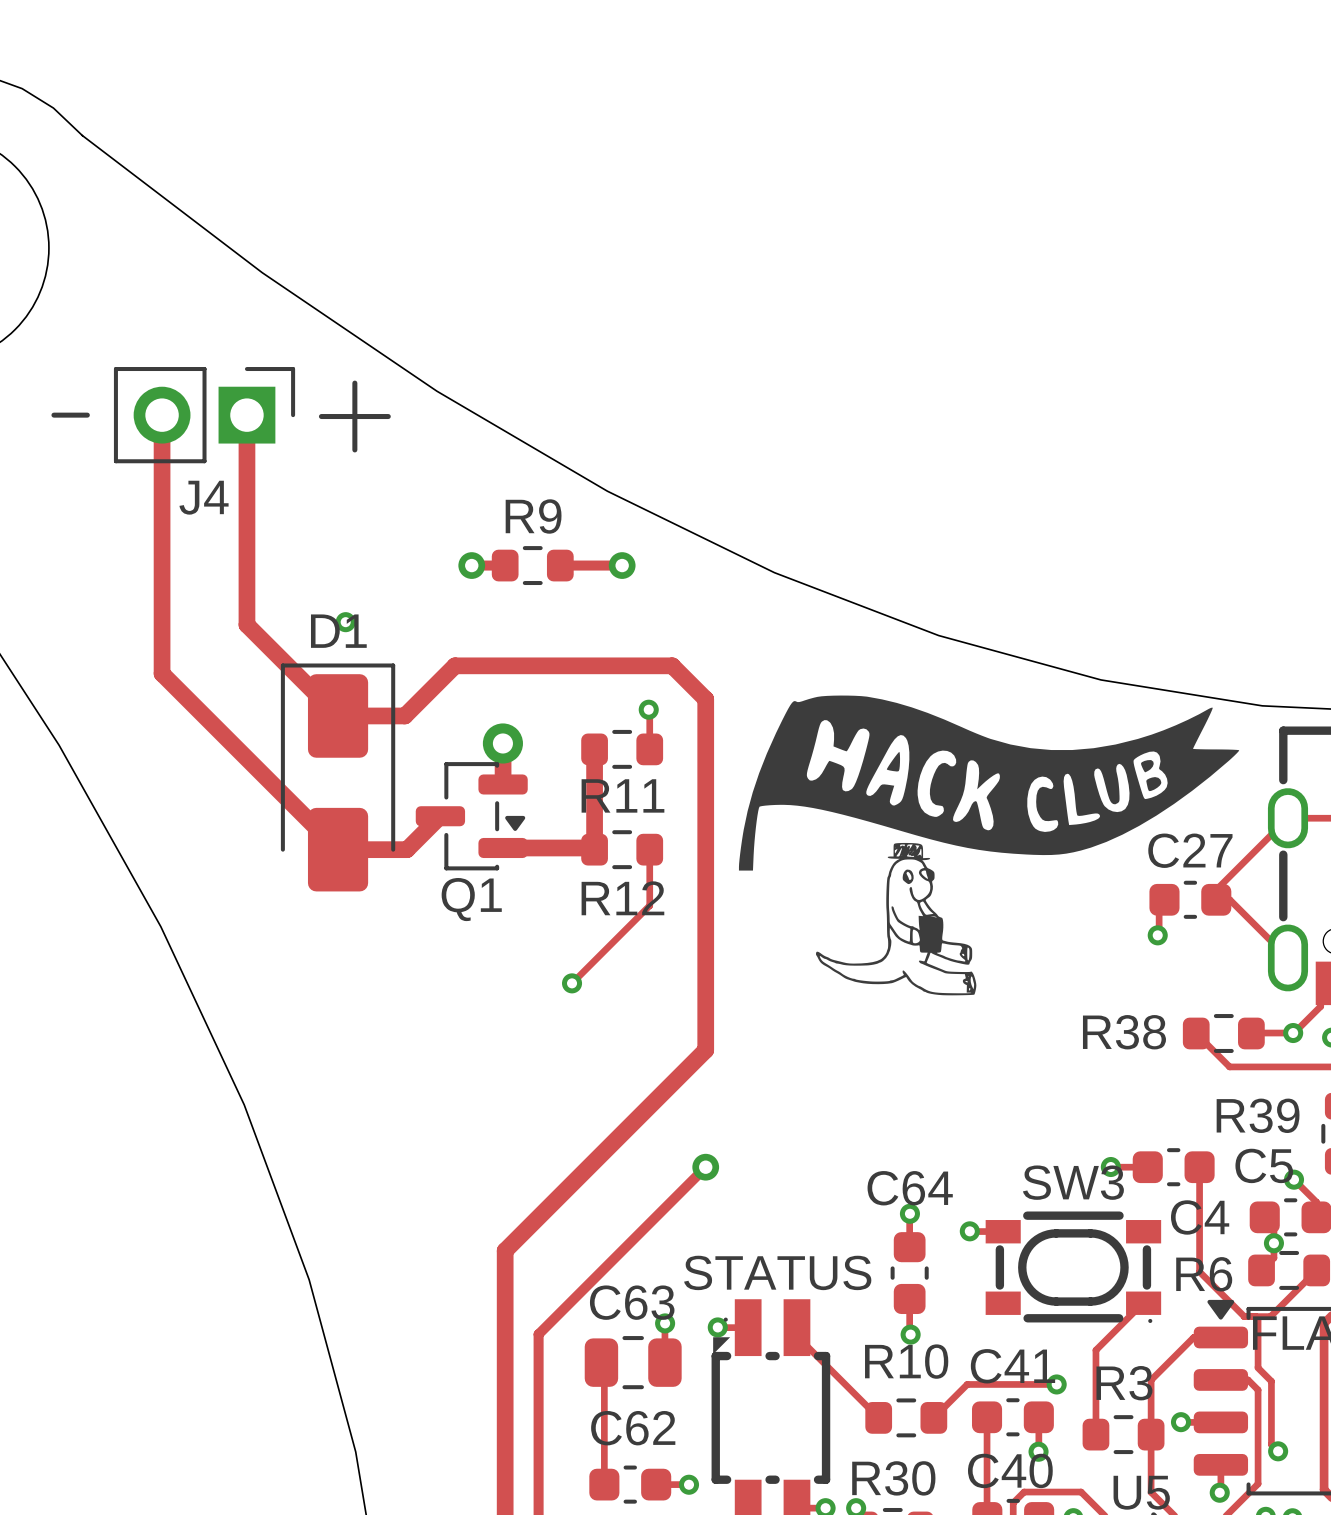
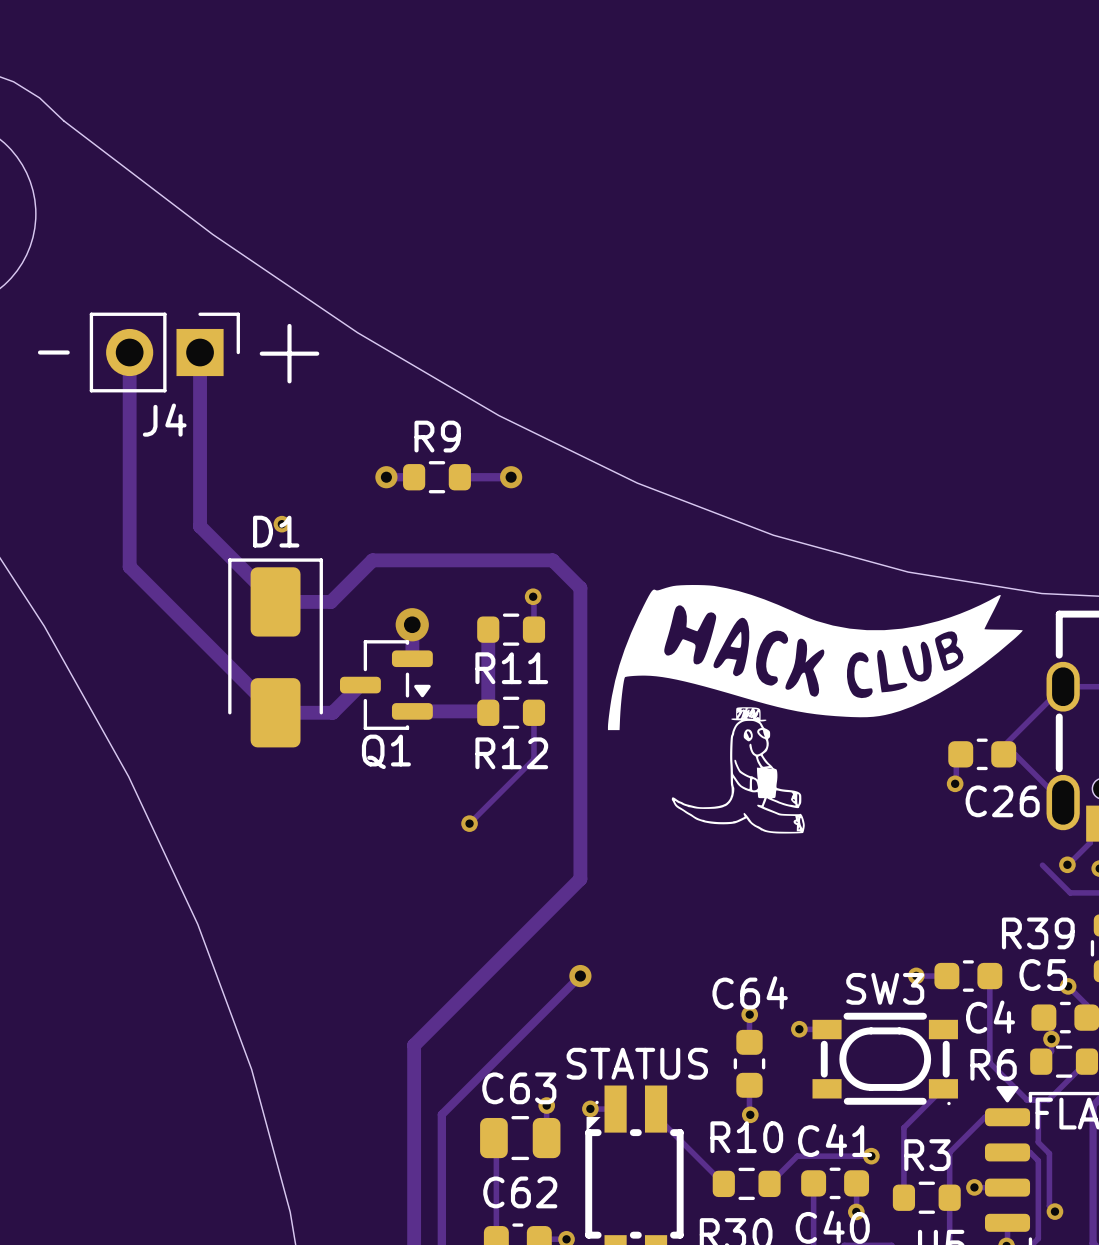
C27 name: C27 (1190, 850) -> C26 (1002, 801)
track: (1196, 1033) (1229, 1066) (1296, 1066) -> (1042, 865) (1070, 892)
R38: (1223, 1033) -> none
track: (1293, 1033) (1251, 1033) -> none

